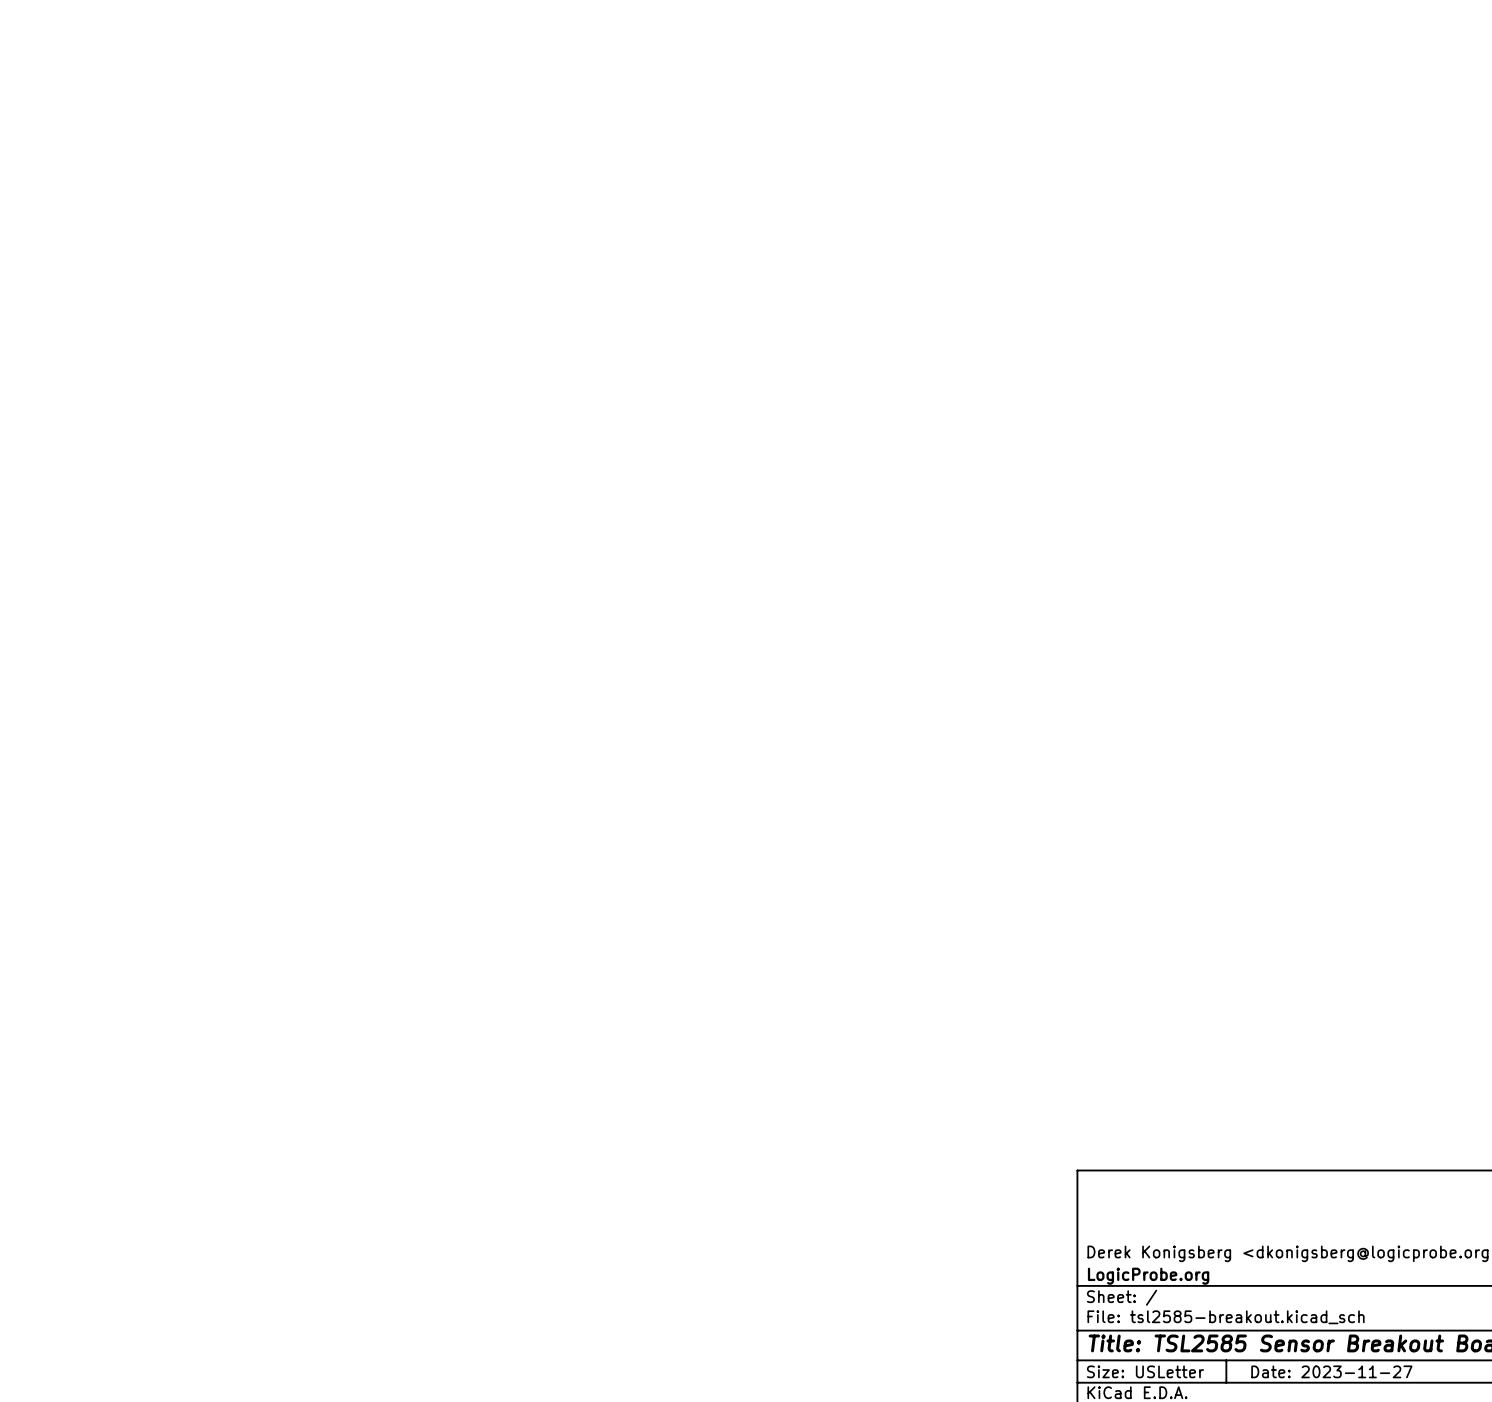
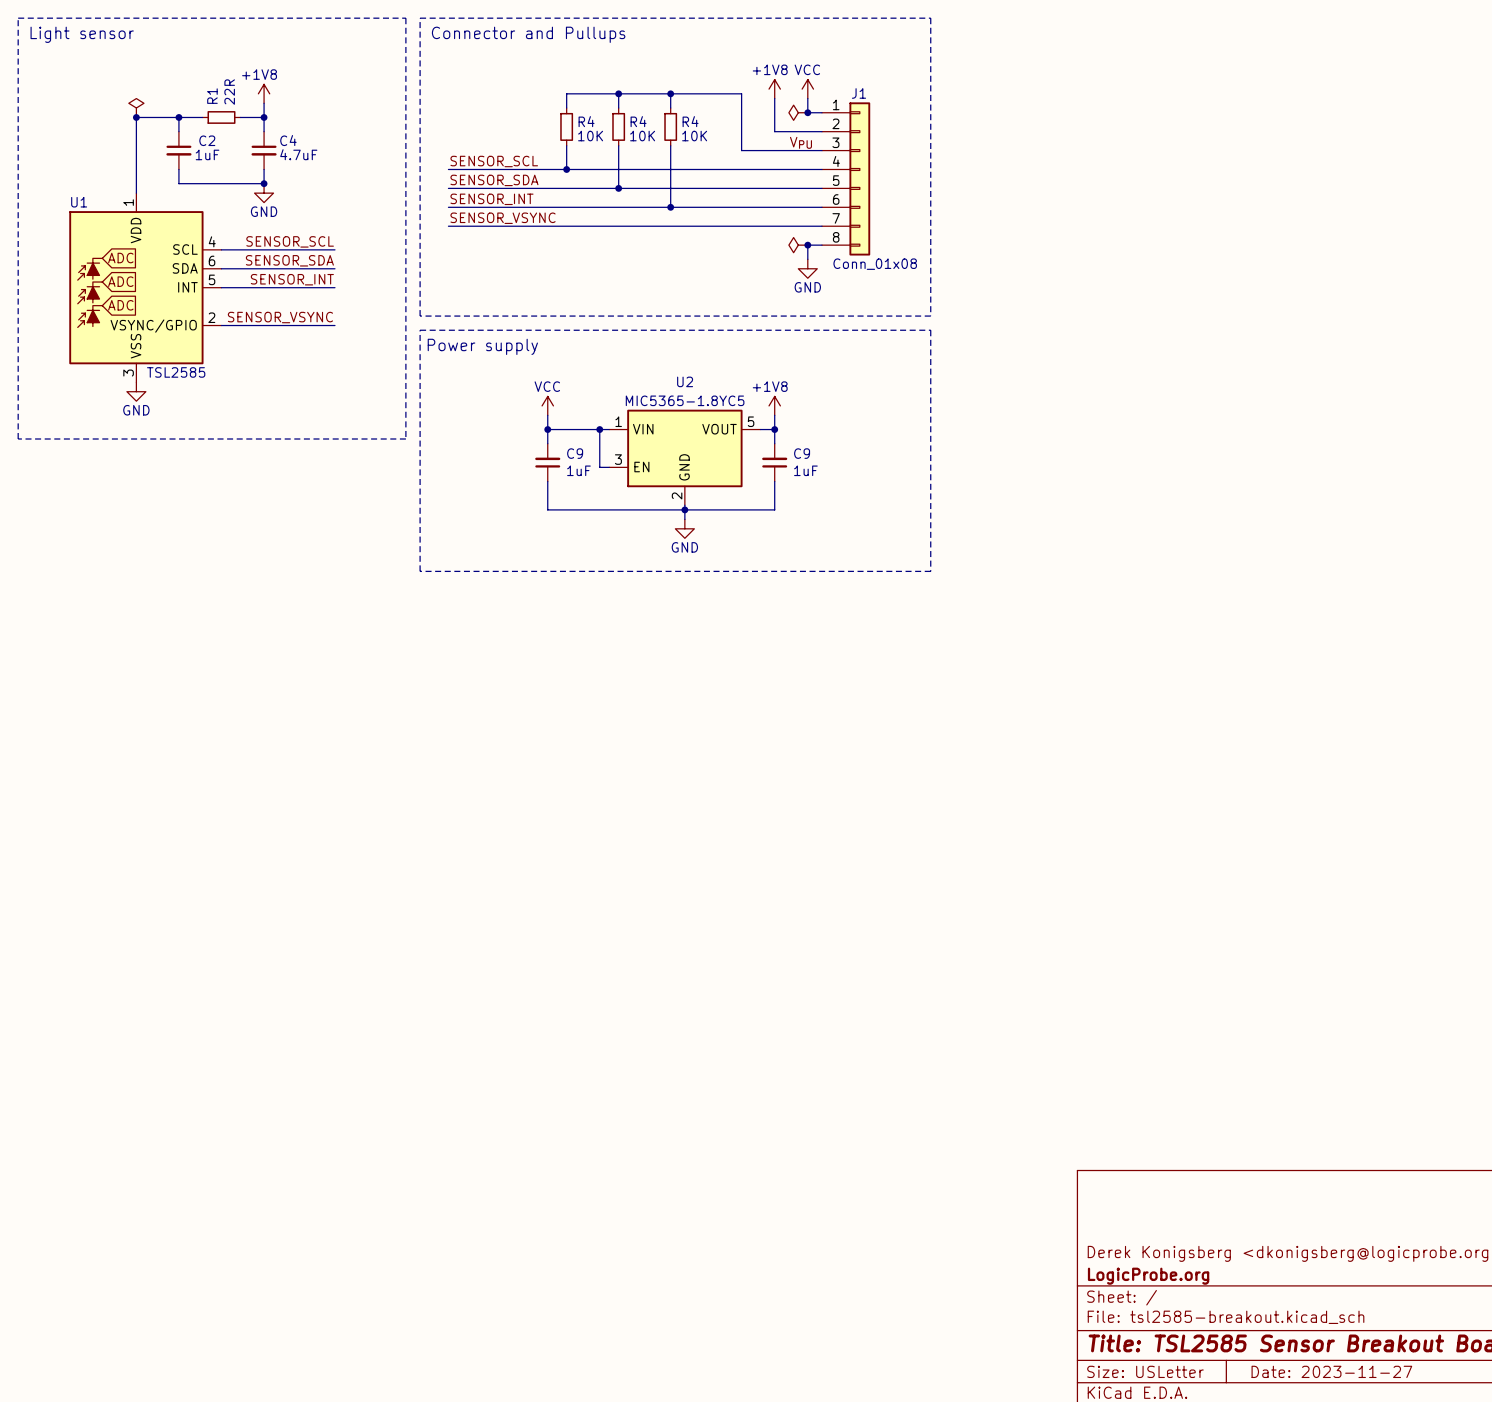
line: none -> (18, 18) (405, 18) (405, 439) (18, 439) (18, 18)
line: none -> (420, 18) (930, 18) (930, 316) (420, 316) (420, 18)
text: none -> Light sensor (82, 34)
text: none -> Connector and Pullups (528, 34)
power symbol: none -> +1V8 (774, 89)
power symbol: none -> VCC (807, 89)
power symbol: none -> +1V8 (264, 93)
wire: none -> (618, 93) (618, 108)
junction: none -> (618, 93)
wire: none -> (670, 93) (670, 108)
junction: none -> (670, 93)
wire: none -> (774, 98) (774, 131) (821, 131)
wire: none -> (807, 98) (807, 112) (821, 112)
wire: none -> (264, 103) (264, 131)
power symbol: none -> (136, 108)
wire: none -> (566, 108) (566, 93) (741, 93) (741, 150) (821, 150)
power symbol: none -> (798, 112)
junction: none -> (807, 112)
junction: none -> (136, 117)
wire: none -> (178, 117) (178, 131)
junction: none -> (178, 117)
wire: none -> (202, 117) (136, 117) (136, 193)
R1: none -> 22R (221, 117)
wire: none -> (240, 117) (264, 117)
junction: none -> (264, 117)
R4: none -> 10K (566, 126)
R4: none -> 10K (618, 126)
R4: none -> 10K (670, 126)
label: none -> VPU (800, 142)
wire: none -> (566, 145) (566, 169)
wire: none -> (618, 145) (618, 188)
wire: none -> (670, 145) (670, 207)
C2: none -> 1uF (178, 150)
C4: none -> 4.7uF (264, 150)
label: none -> SENSOR_SCL (494, 161)
wire: none -> (178, 169) (178, 183) (264, 183) (264, 169)
wire: none -> (448, 169) (821, 169)
junction: none -> (566, 169)
J1: none -> Conn_01x08 (846, 178)
label: none -> SENSOR_SDA (494, 180)
junction: none -> (264, 183)
wire: none -> (448, 188) (821, 188)
junction: none -> (618, 188)
power symbol: none -> GND (264, 193)
label: none -> SENSOR_INT (491, 199)
wire: none -> (448, 207) (821, 207)
junction: none -> (670, 207)
label: none -> SENSOR_VSYNC (503, 218)
wire: none -> (448, 226) (821, 226)
label: none -> SENSOR_SCL (290, 241)
power symbol: none -> (798, 245)
junction: none -> (807, 245)
wire: none -> (821, 245) (807, 245) (807, 259)
wire: none -> (221, 249) (334, 249)
label: none -> SENSOR_SDA (289, 260)
wire: none -> (221, 268) (334, 268)
power symbol: none -> GND (807, 268)
label: none -> SENSOR_INT (292, 279)
U1: none -> TSL2585 (145, 287)
wire: none -> (221, 287) (334, 287)
label: none -> SENSOR_VSYNC (280, 317)
wire: none -> (221, 325) (334, 325)
line: none -> (420, 330) (420, 571) (930, 571) (930, 330) (420, 330)
text: none -> Power supply (482, 346)
power symbol: none -> GND (136, 391)
power symbol: none -> VCC (547, 405)
power symbol: none -> +1V8 (774, 405)
wire: none -> (547, 415) (547, 443)
wire: none -> (774, 415) (774, 443)
wire: none -> (547, 429) (609, 429)
junction: none -> (547, 429)
wire: none -> (599, 429) (599, 467) (609, 467)
junction: none -> (599, 429)
wire: none -> (760, 429) (774, 429)
junction: none -> (774, 429)
U2: none -> MIC5365-1.8YC5 (684, 457)
C9: none -> 1uF (547, 462)
C9: none -> 1uF (774, 462)
wire: none -> (547, 481) (547, 509) (774, 509) (774, 481)
wire: none -> (684, 505) (684, 519)
junction: none -> (684, 509)
power symbol: none -> GND (684, 528)

